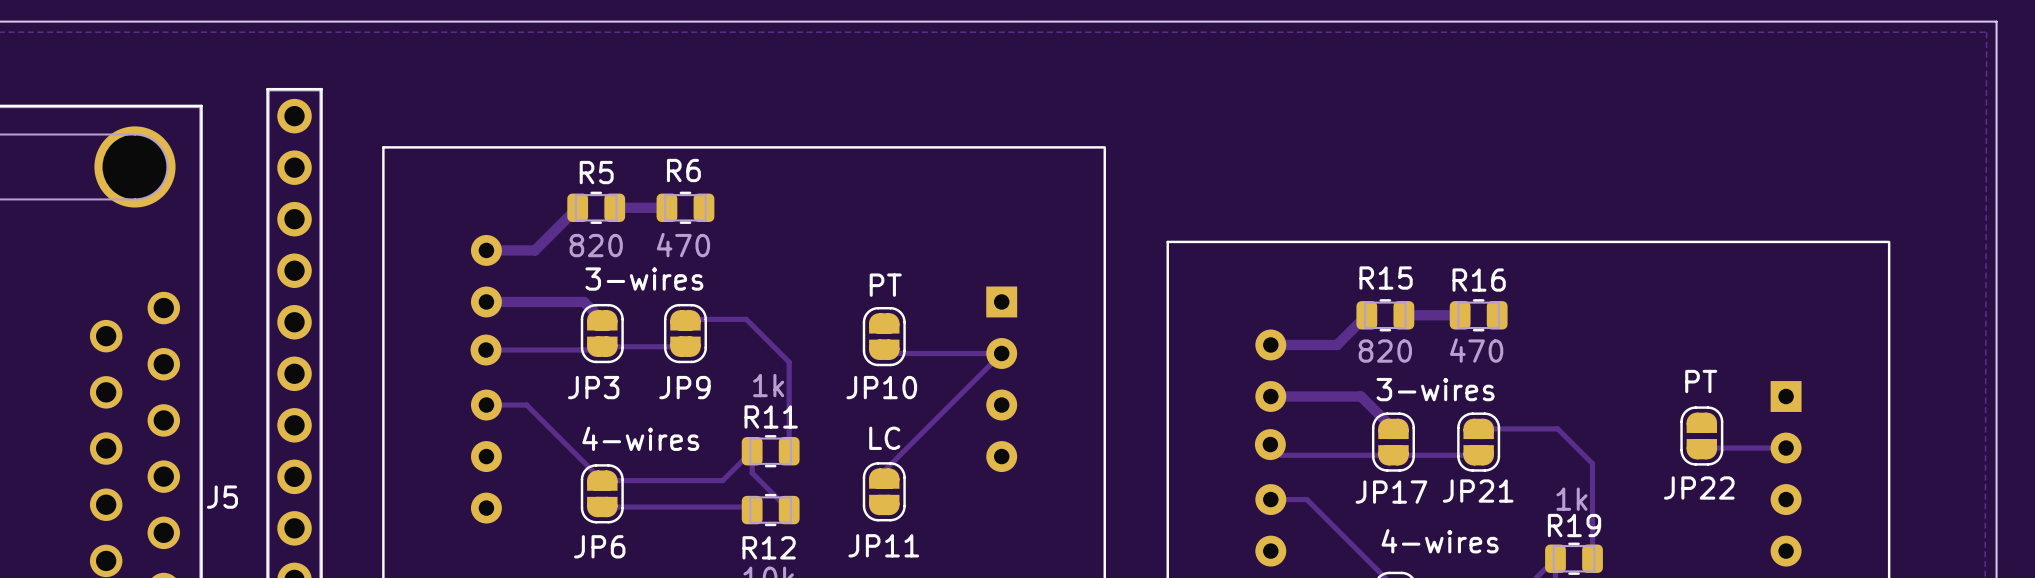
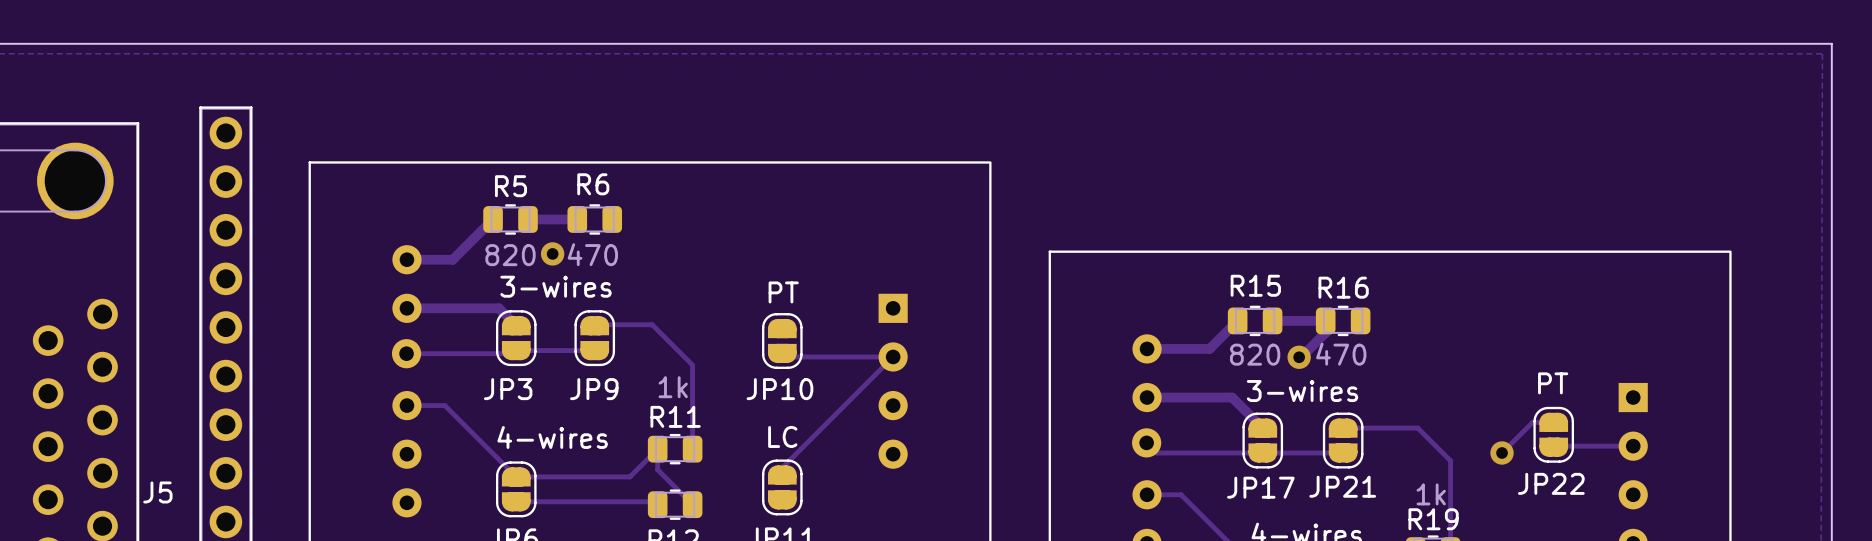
via: none -> (552, 253)
track: none -> (1325, 320) (1325, 332) (1299, 357)
via: none -> (1299, 357)
track: none -> (1553, 422) (1532, 422) (1502, 452)
via: none -> (1502, 452)

